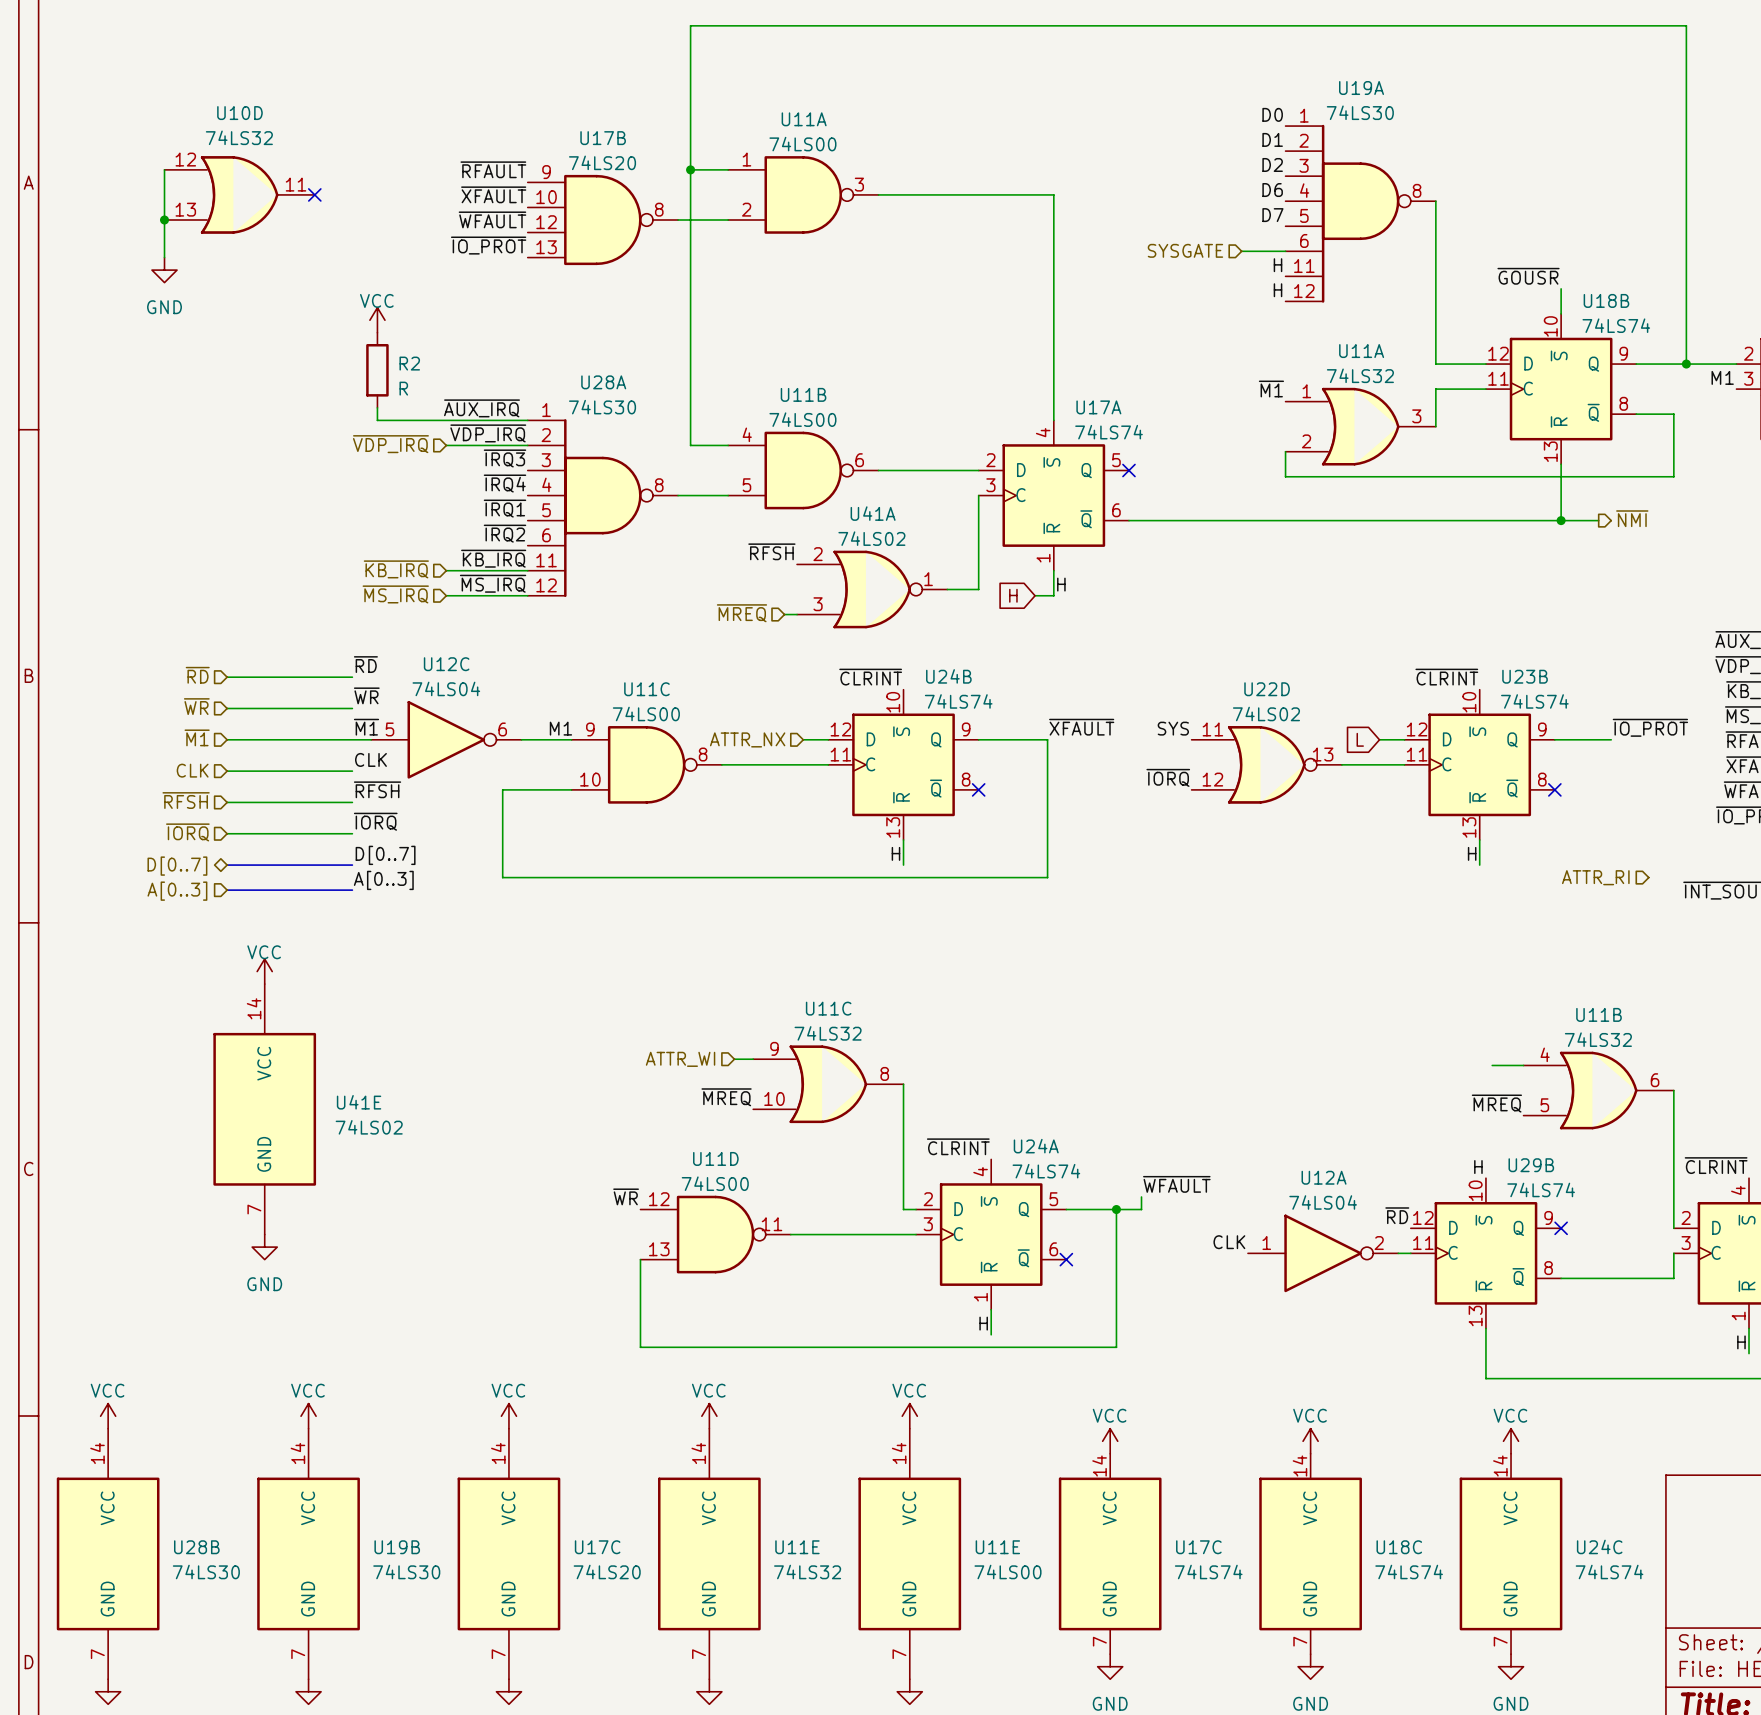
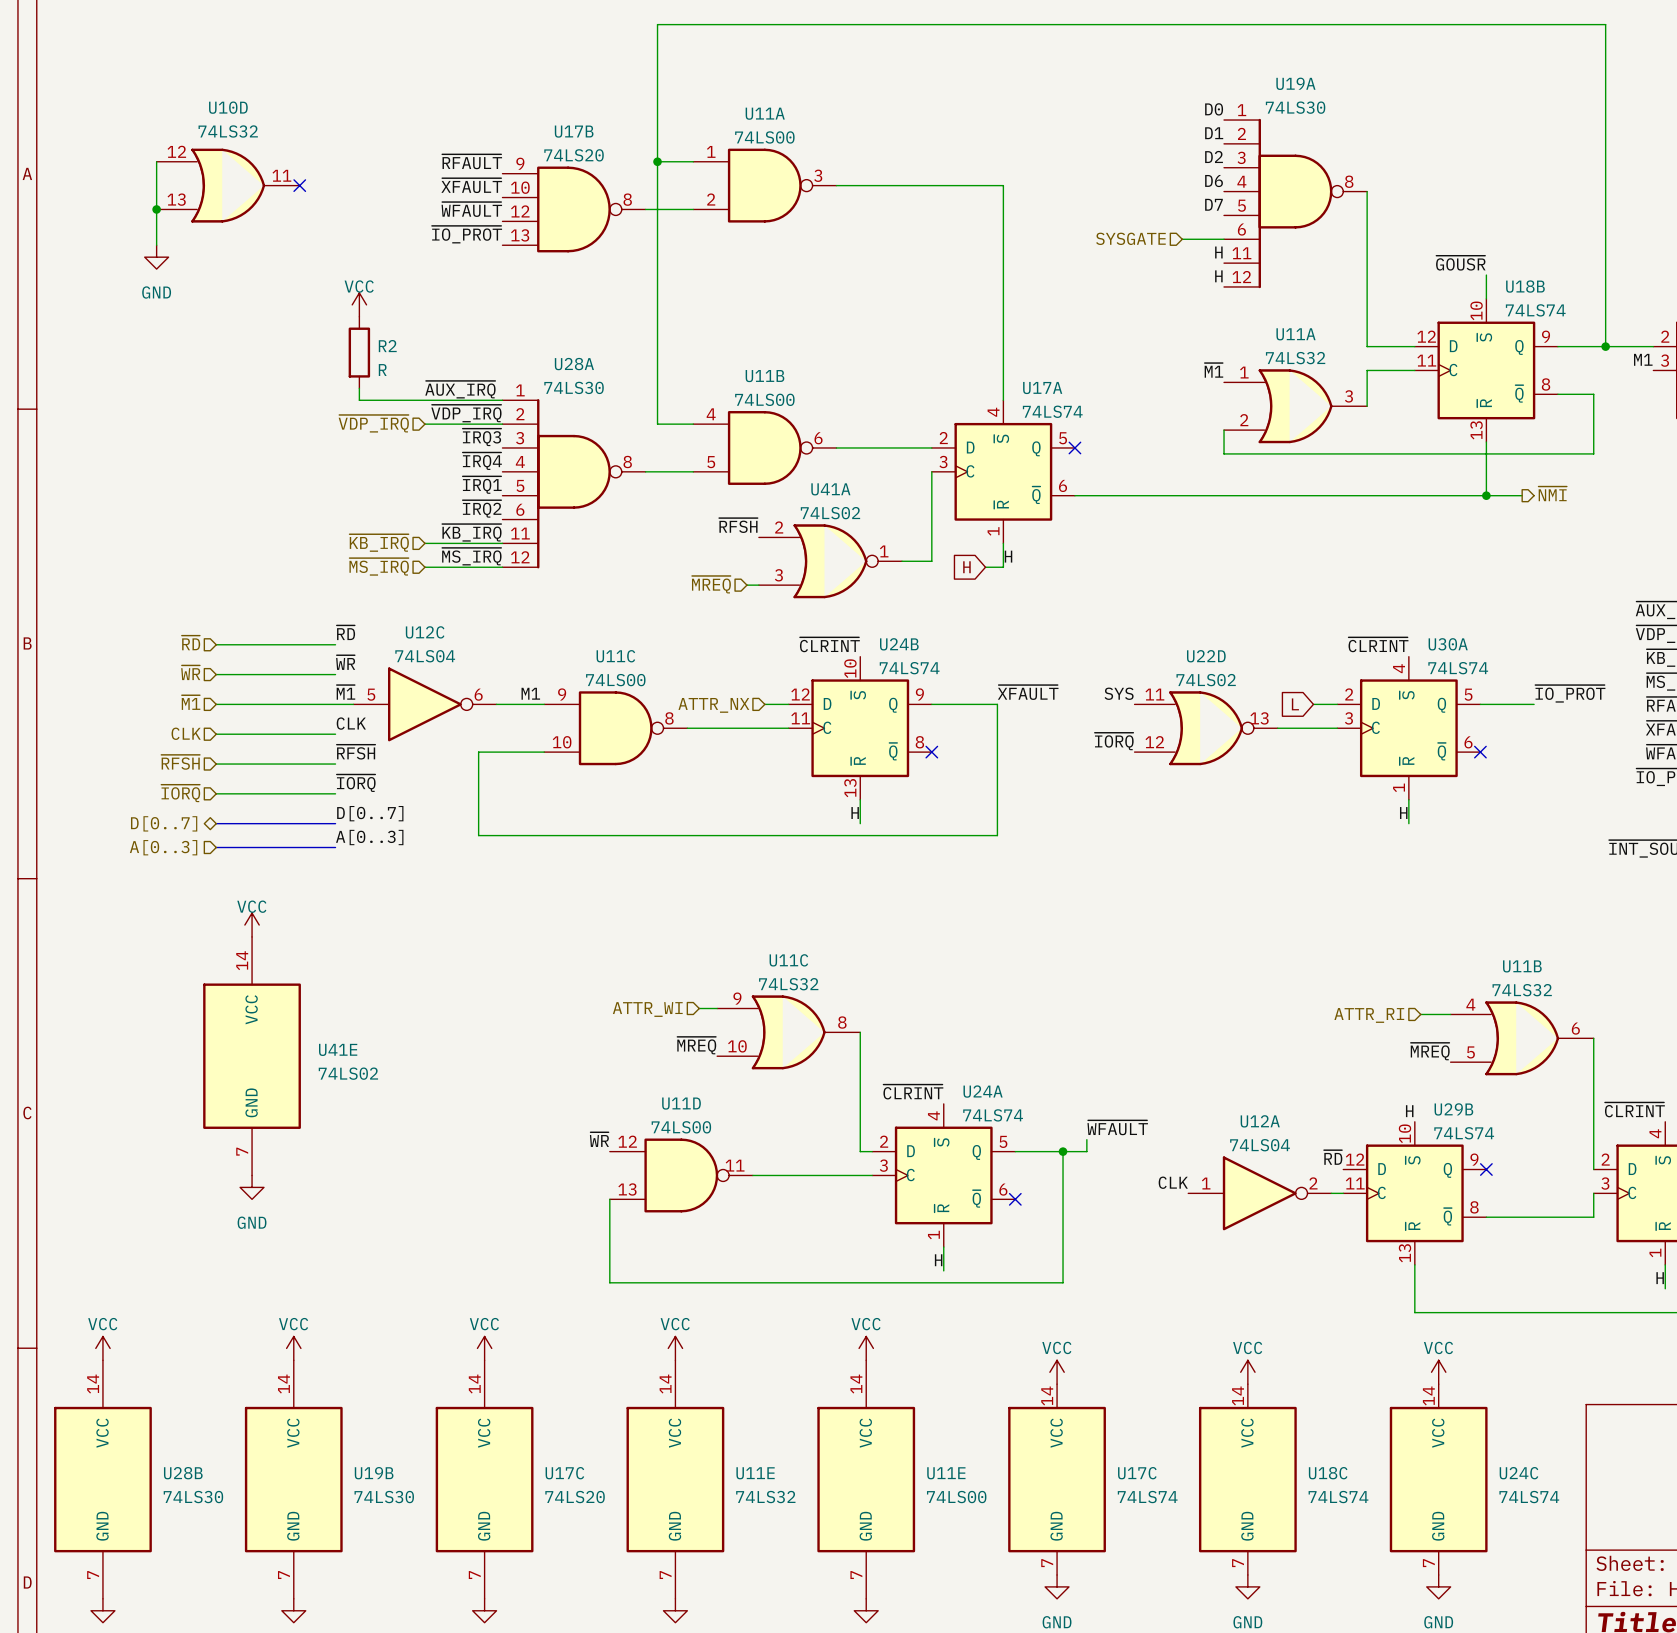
U23B name: U23B (1525, 676) -> U30A (1448, 644)
U23B pin number: 10 (1469, 702) -> 4 (1399, 668)
U23B pin number: 12 (1417, 729) -> 2 (1349, 694)
U23B pin number: 9 (1542, 729) -> 5 (1468, 694)
U23B pin number: 11 (1417, 754) -> 3 (1348, 718)
U23B pin number: 8 (1542, 779) -> 6 (1468, 742)
U23B pin number: 13 (1469, 827) -> 1 (1399, 787)
hierarchical label position: ATTR_RI (1595, 877) -> ATTR_RI (1369, 1015)

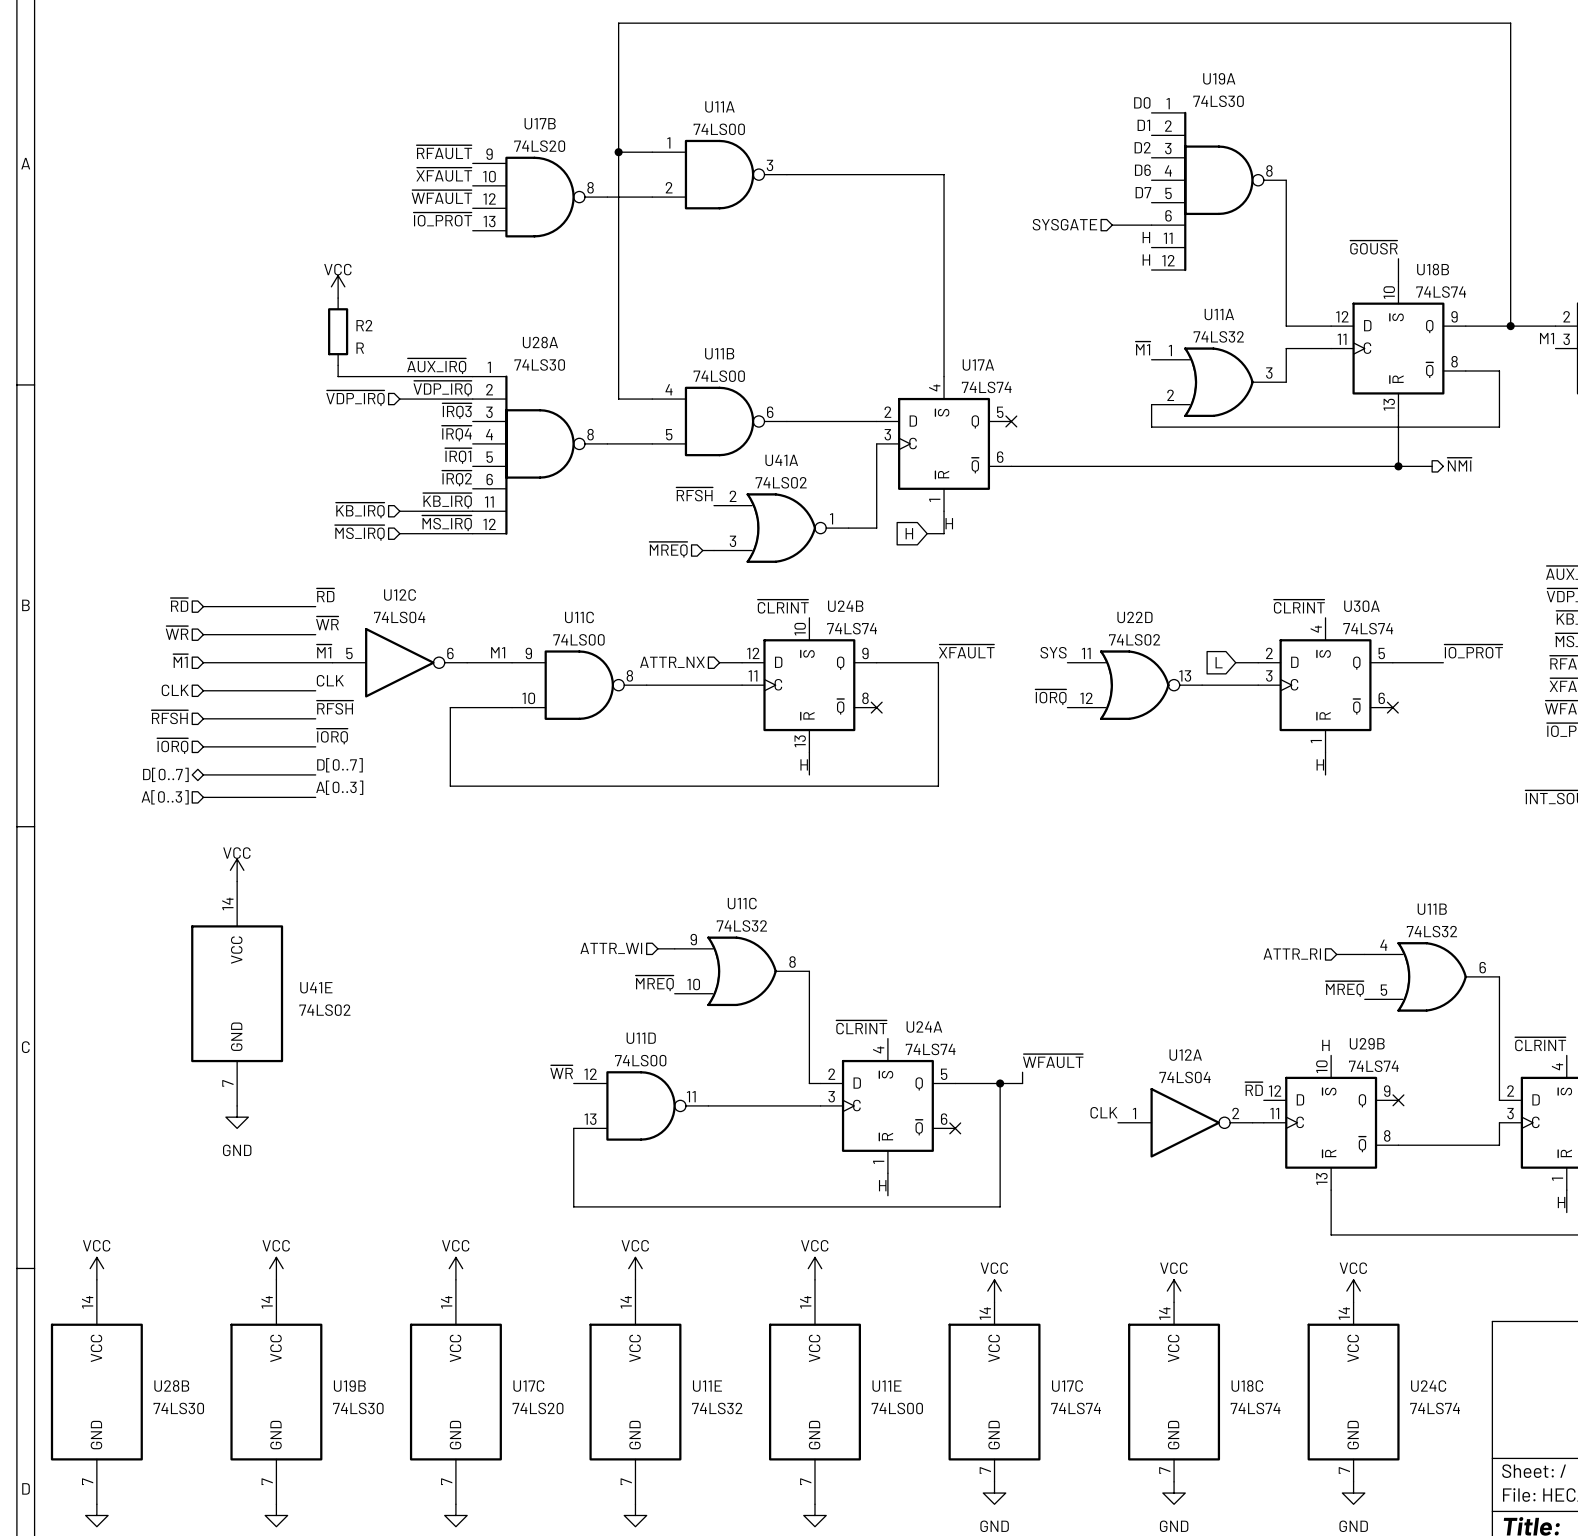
wire: (156, 161) (156, 245) -> none
U10D: 74LS32 (228, 185) -> none
no-connect mark: (299, 185) -> none
junction: (156, 209) -> none
power symbol: GND (156, 257) -> none

